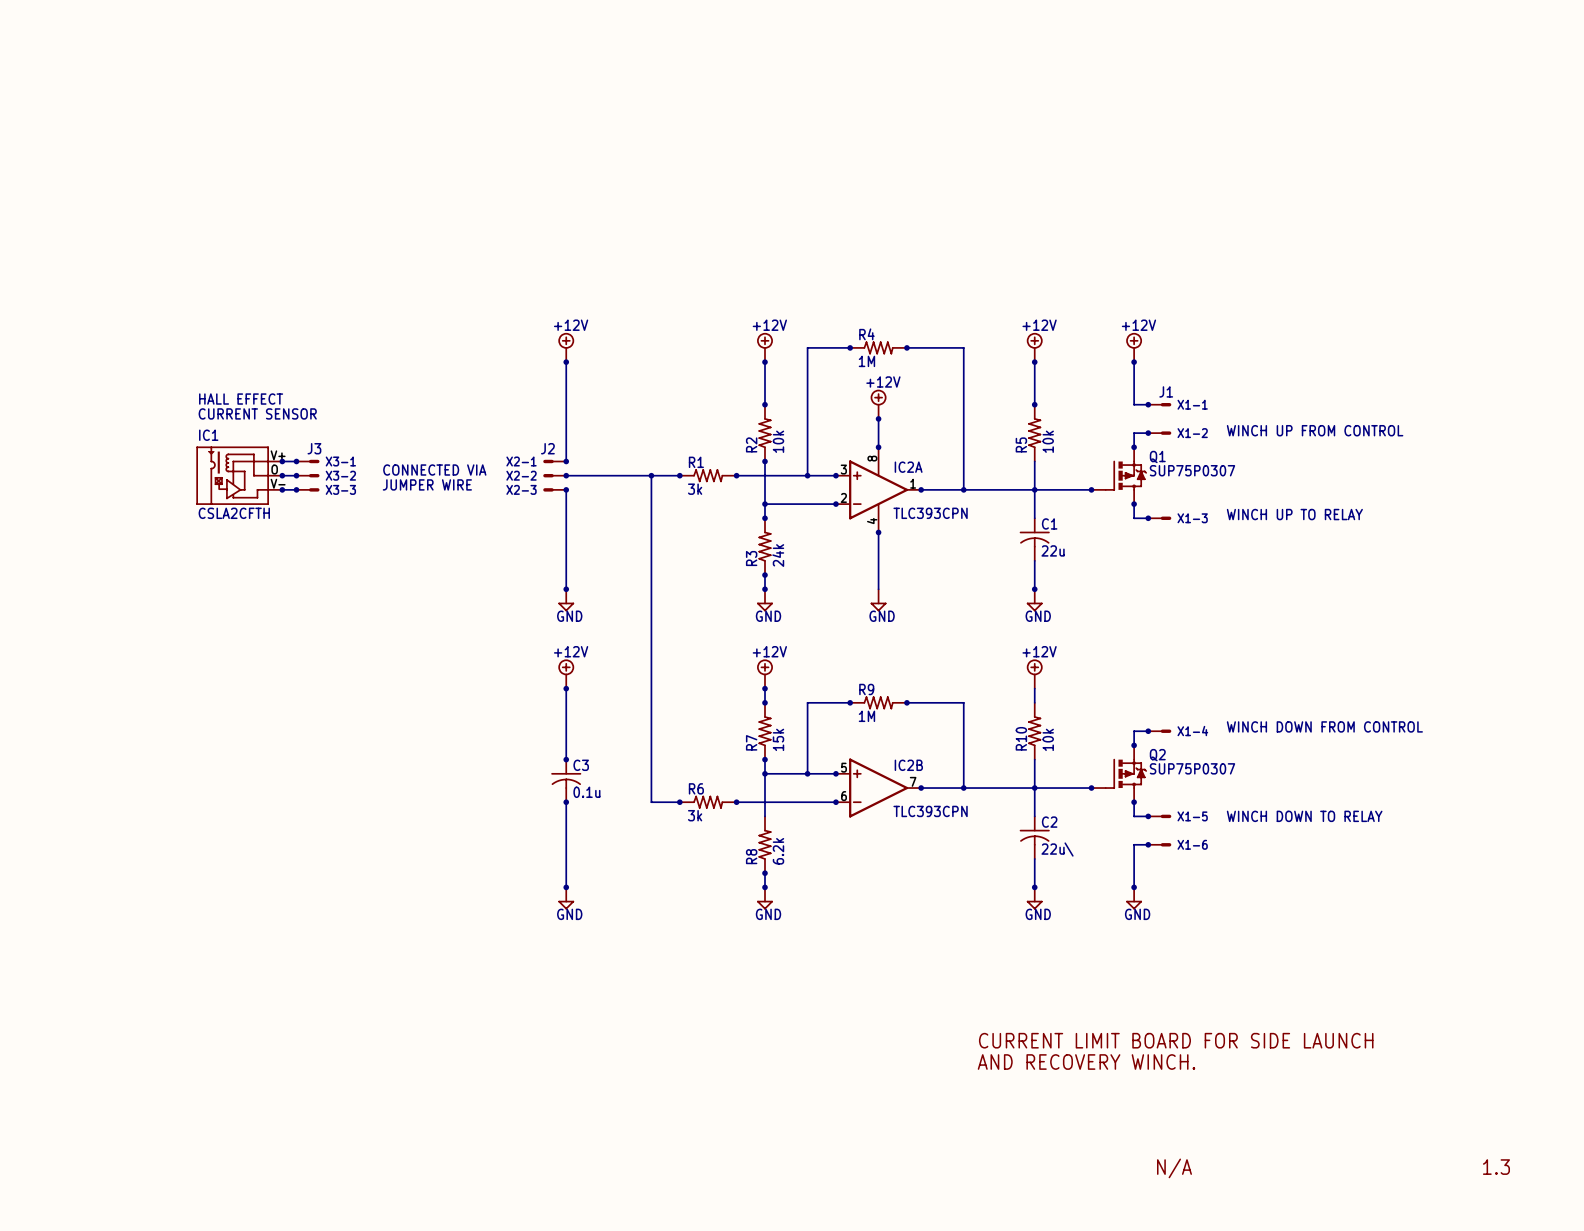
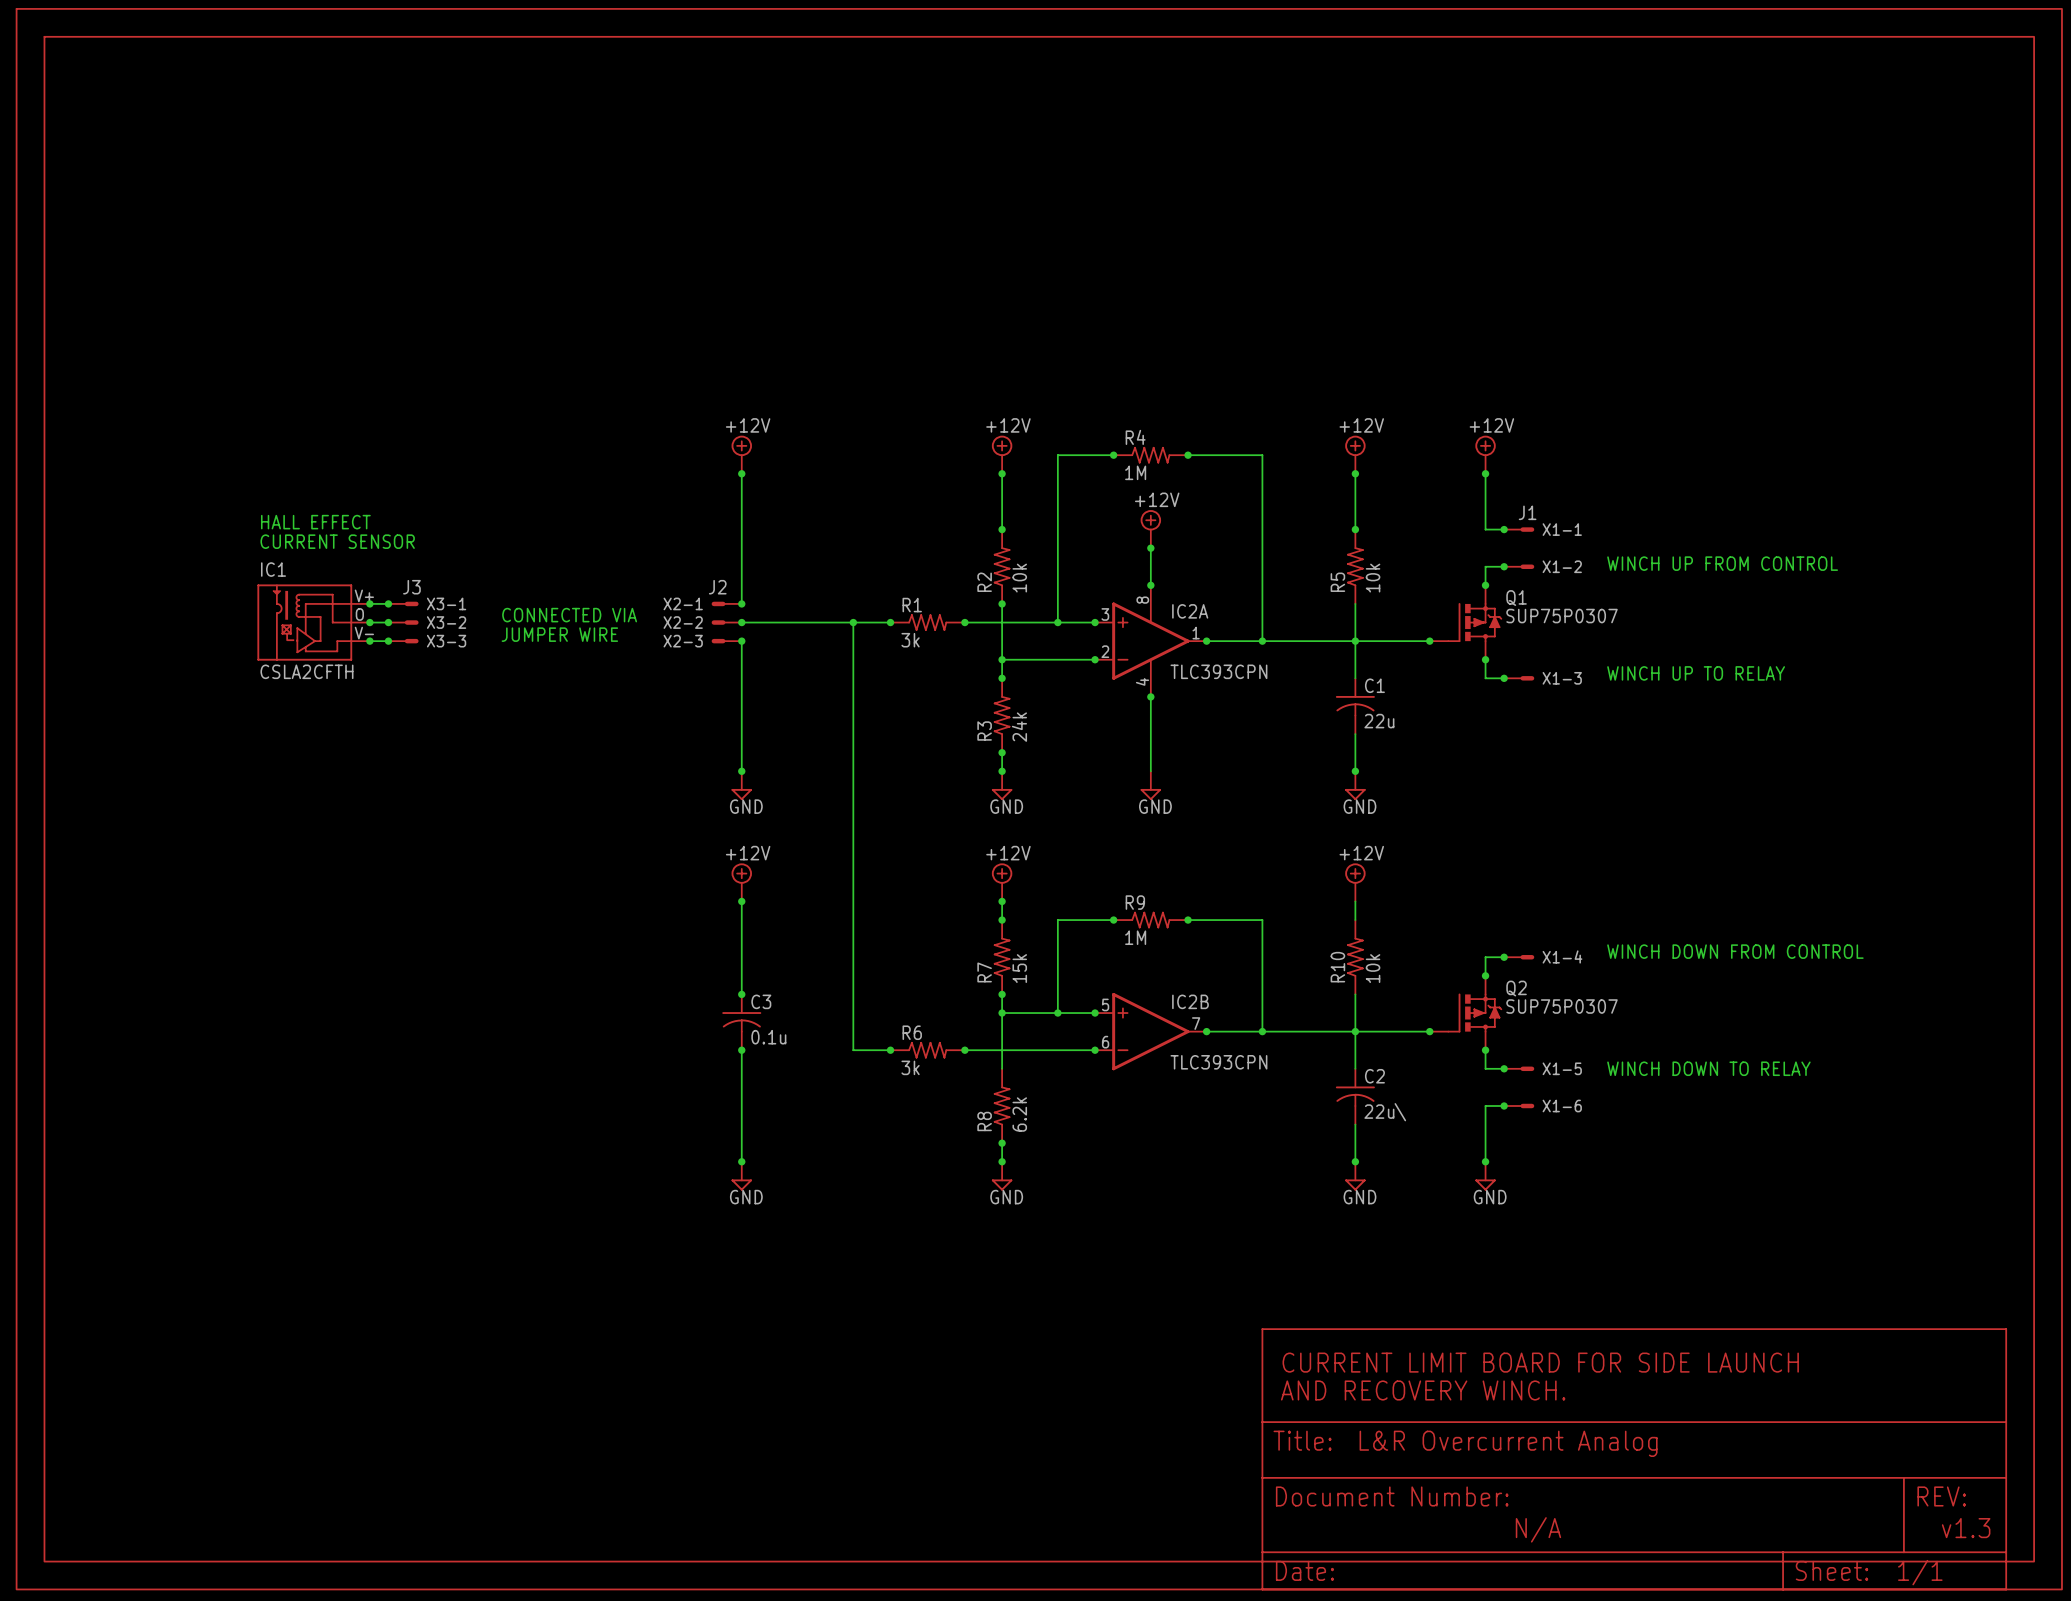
part: none -> (1039, 799)
part: none -> (1634, 1459)
text: 1.3 (1496, 1167) -> v1.3 (1966, 1528)

